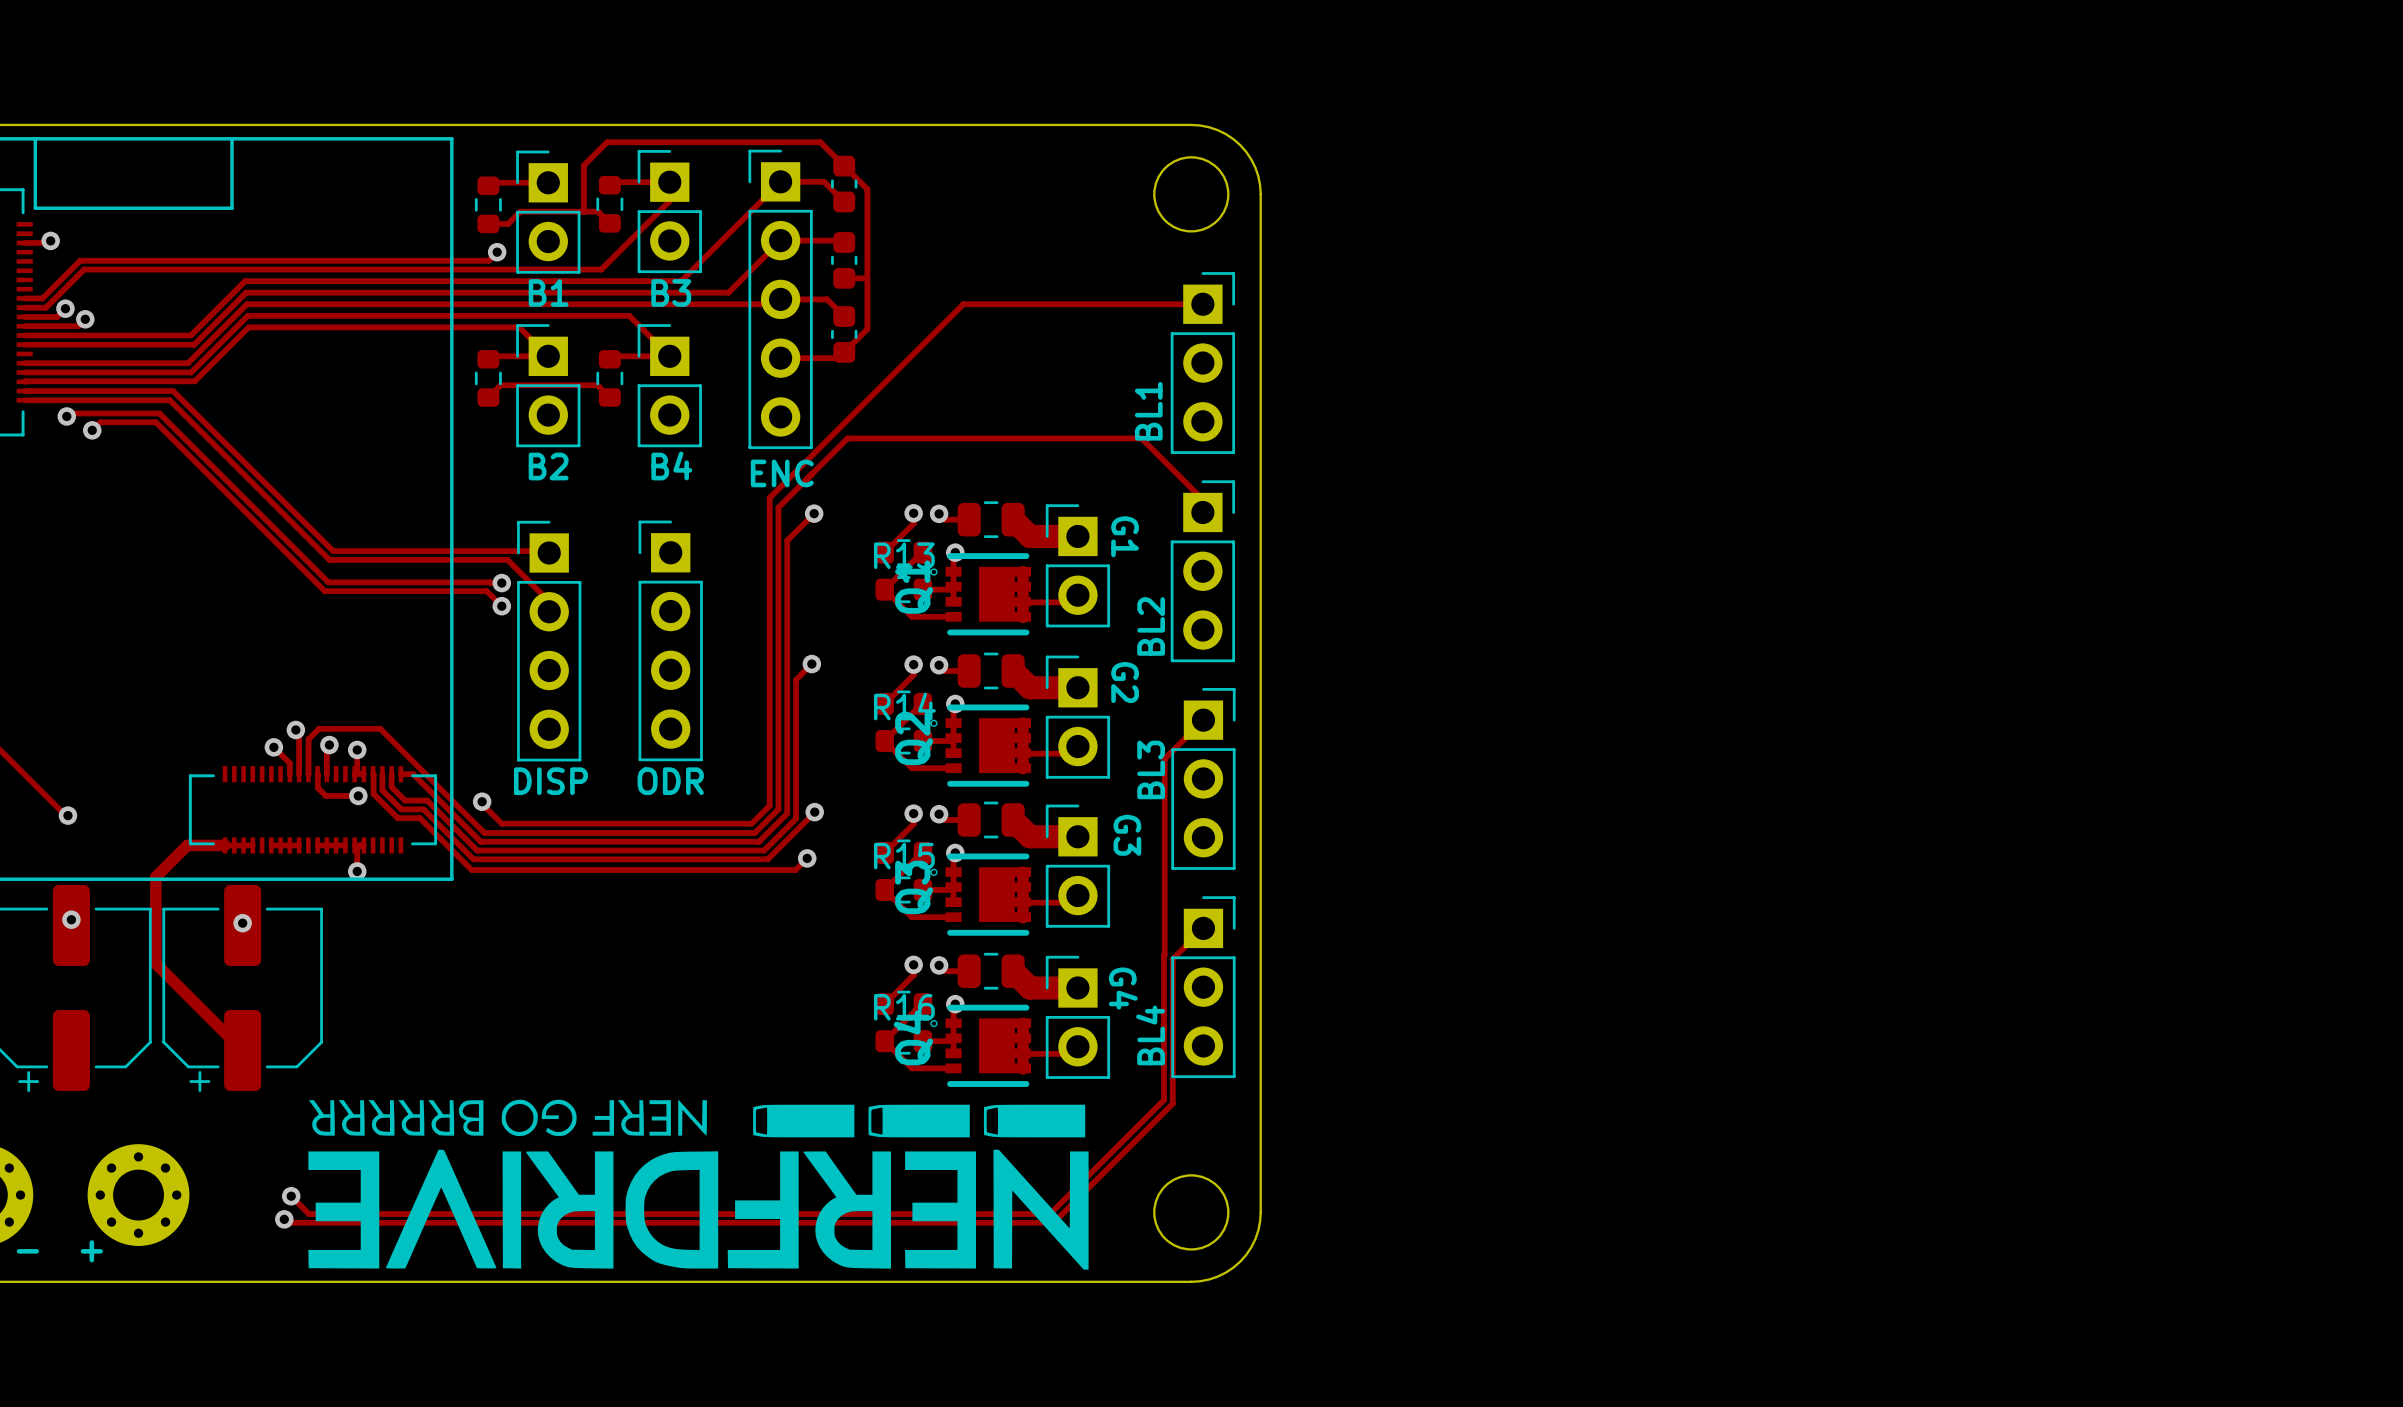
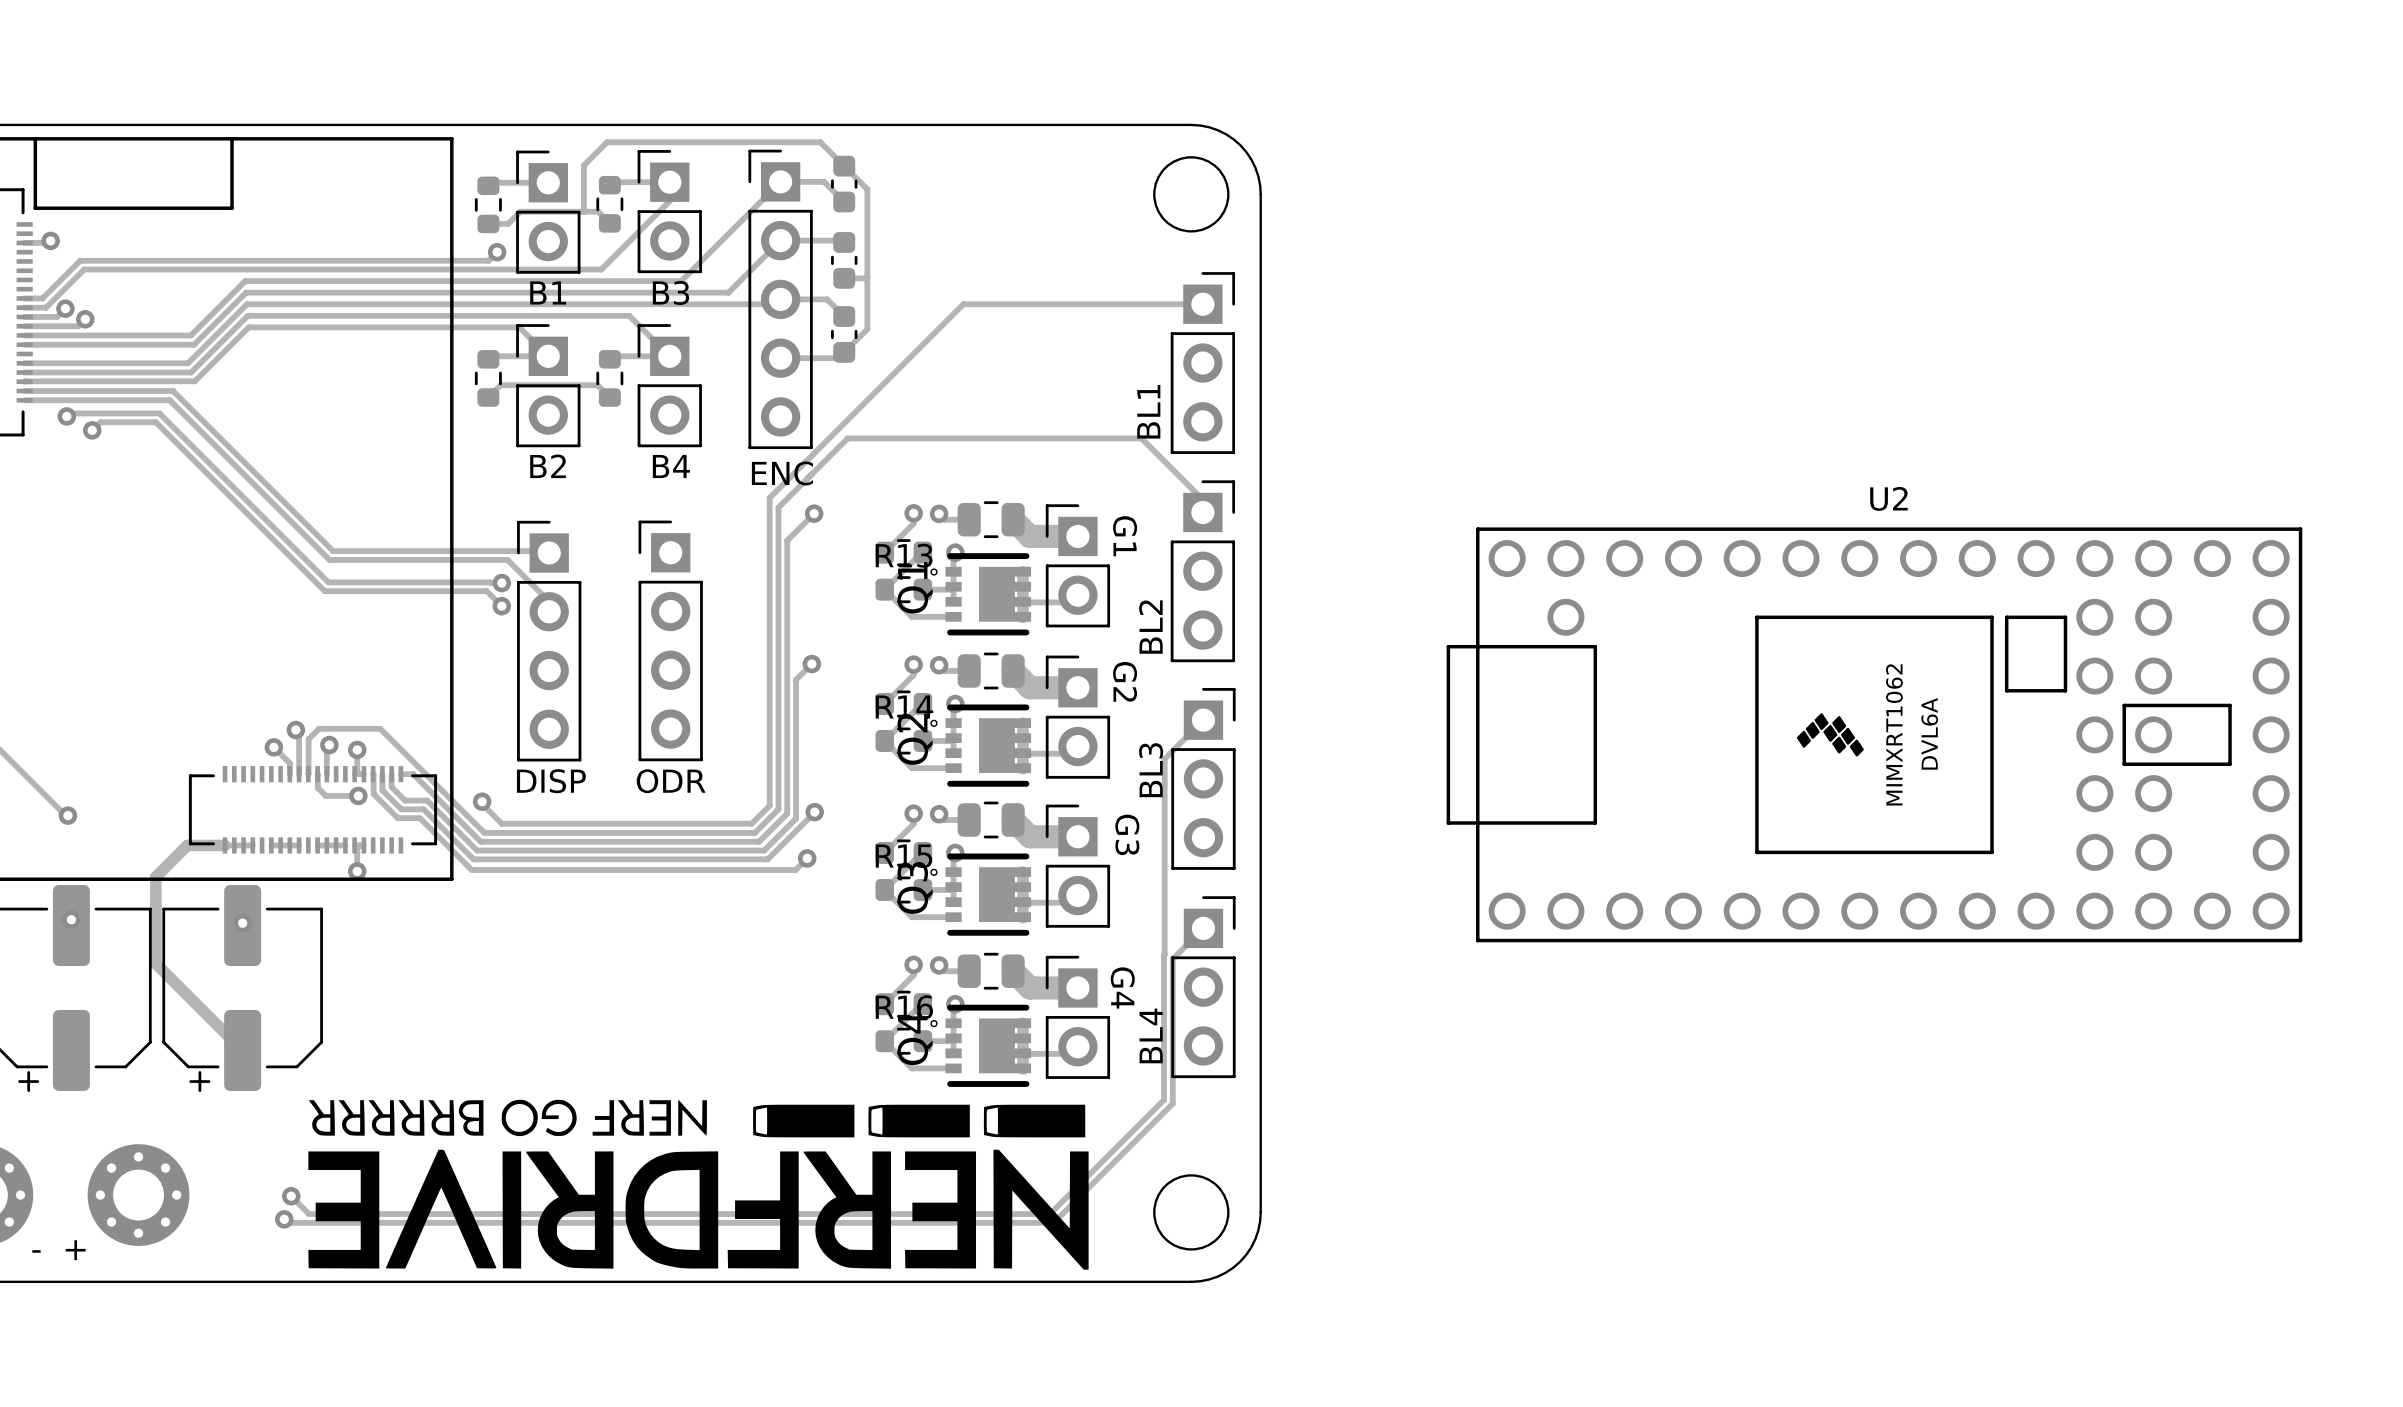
U2: none -> (1874, 734)

